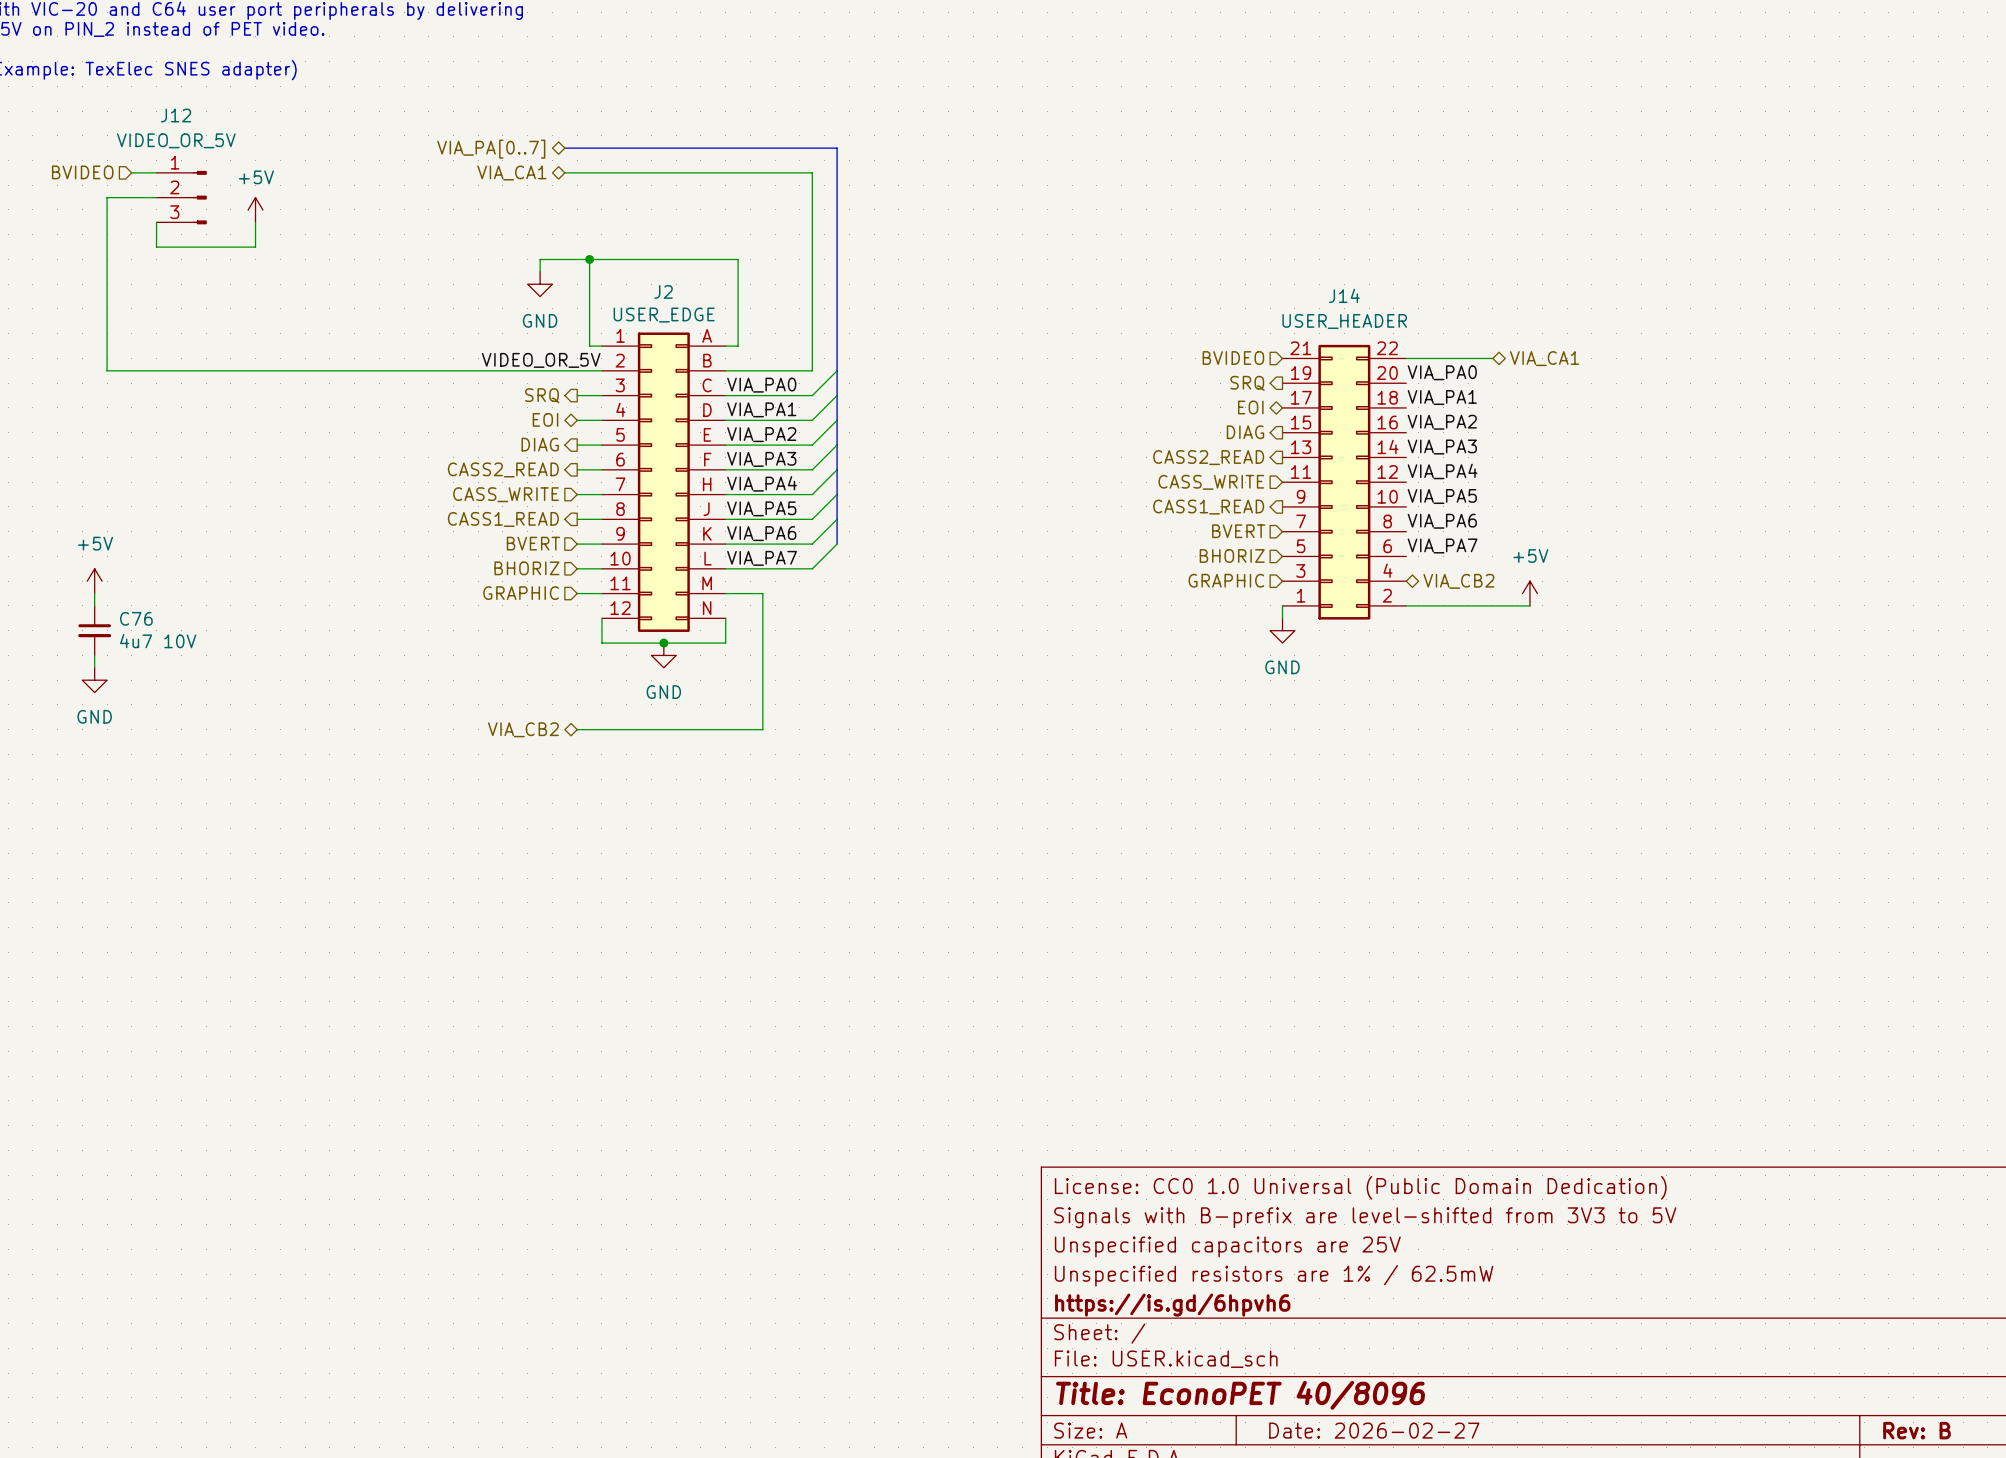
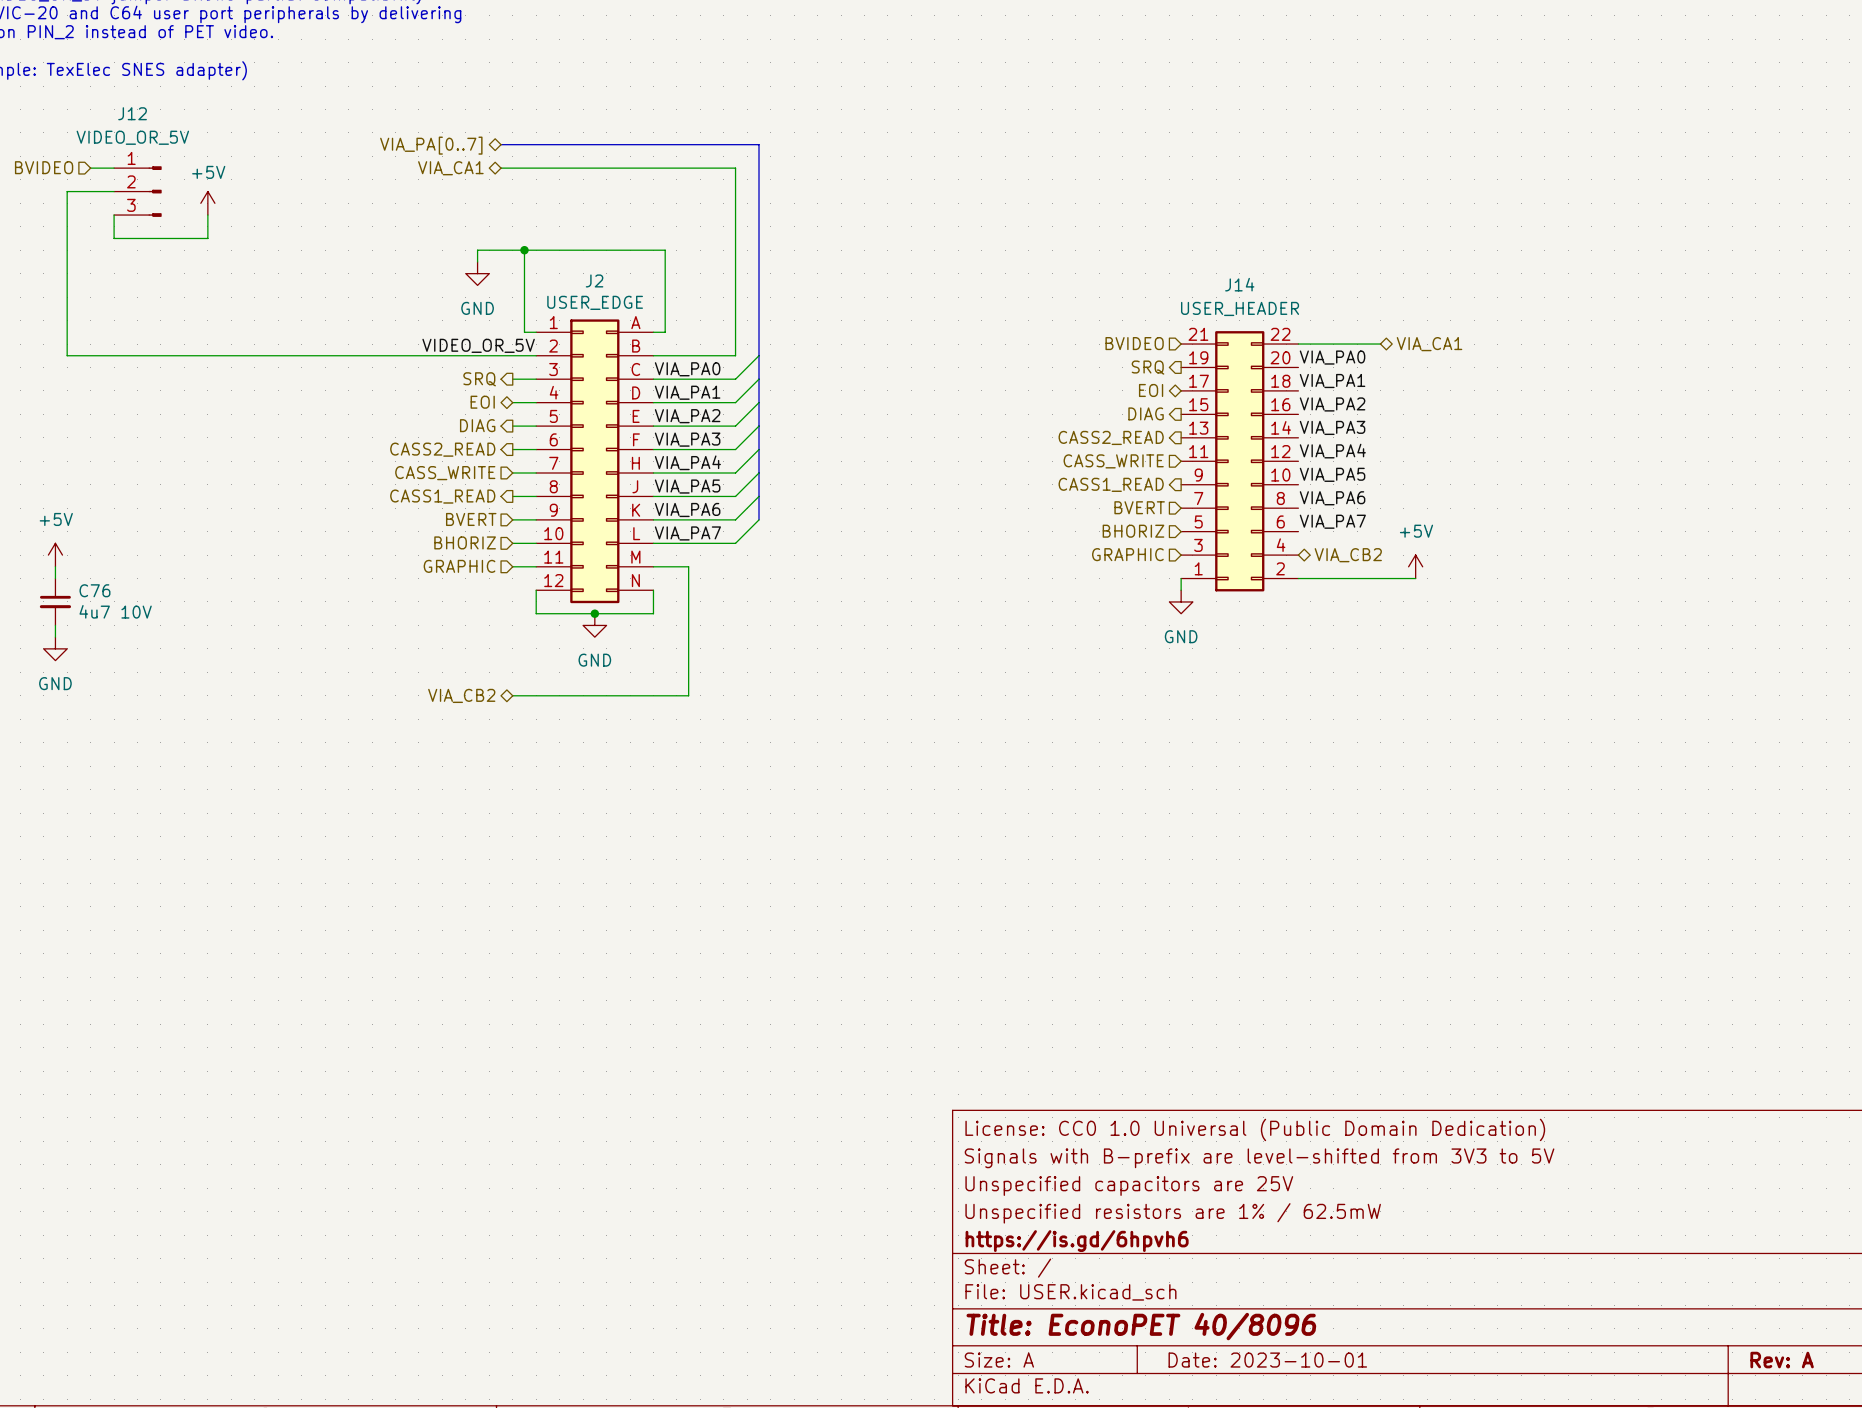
title block: Date: 2026-02-27 (1374, 1430) -> Date: 2023-10-01 (1267, 1360)
title block: Rev: B (1917, 1430) -> Rev: A (1782, 1360)

